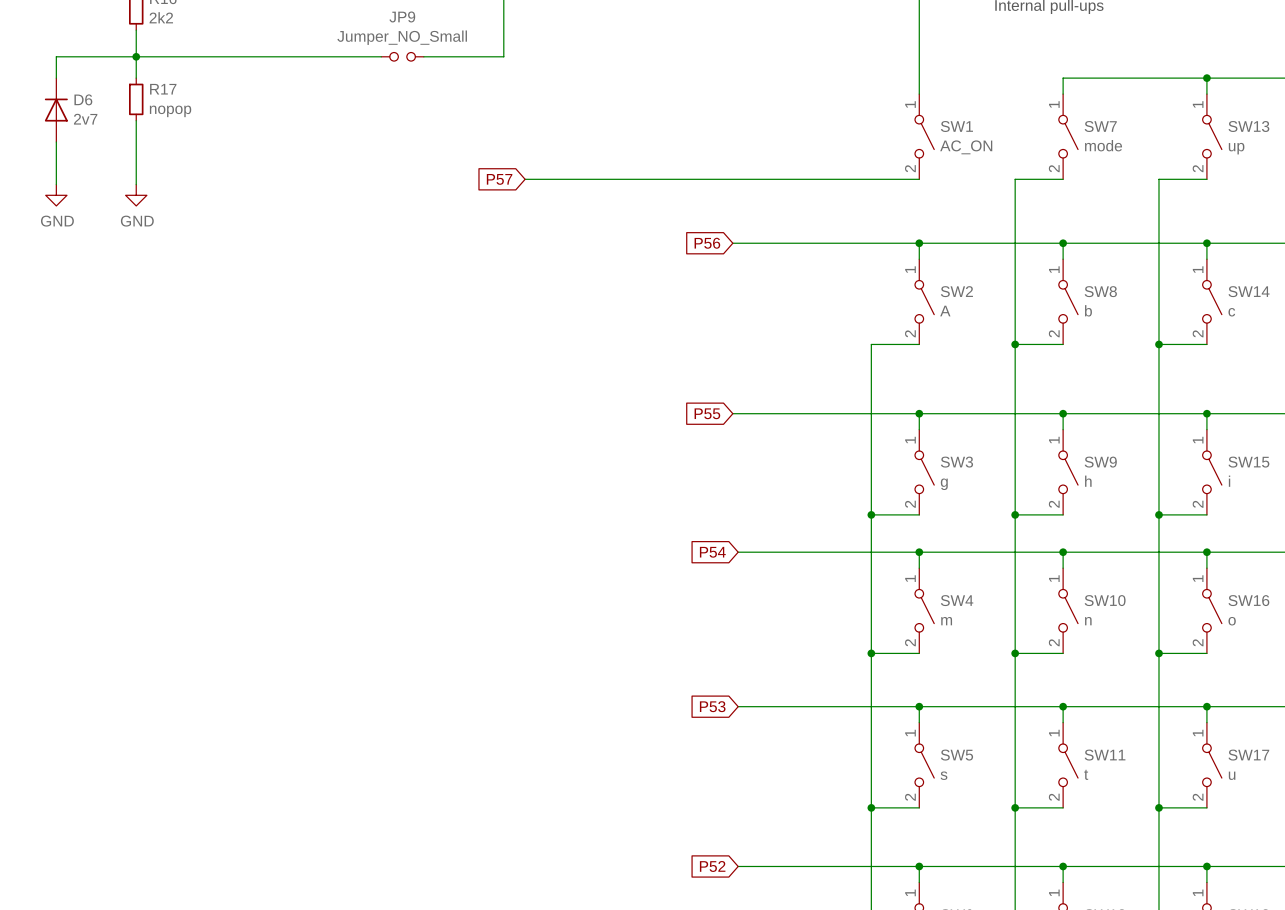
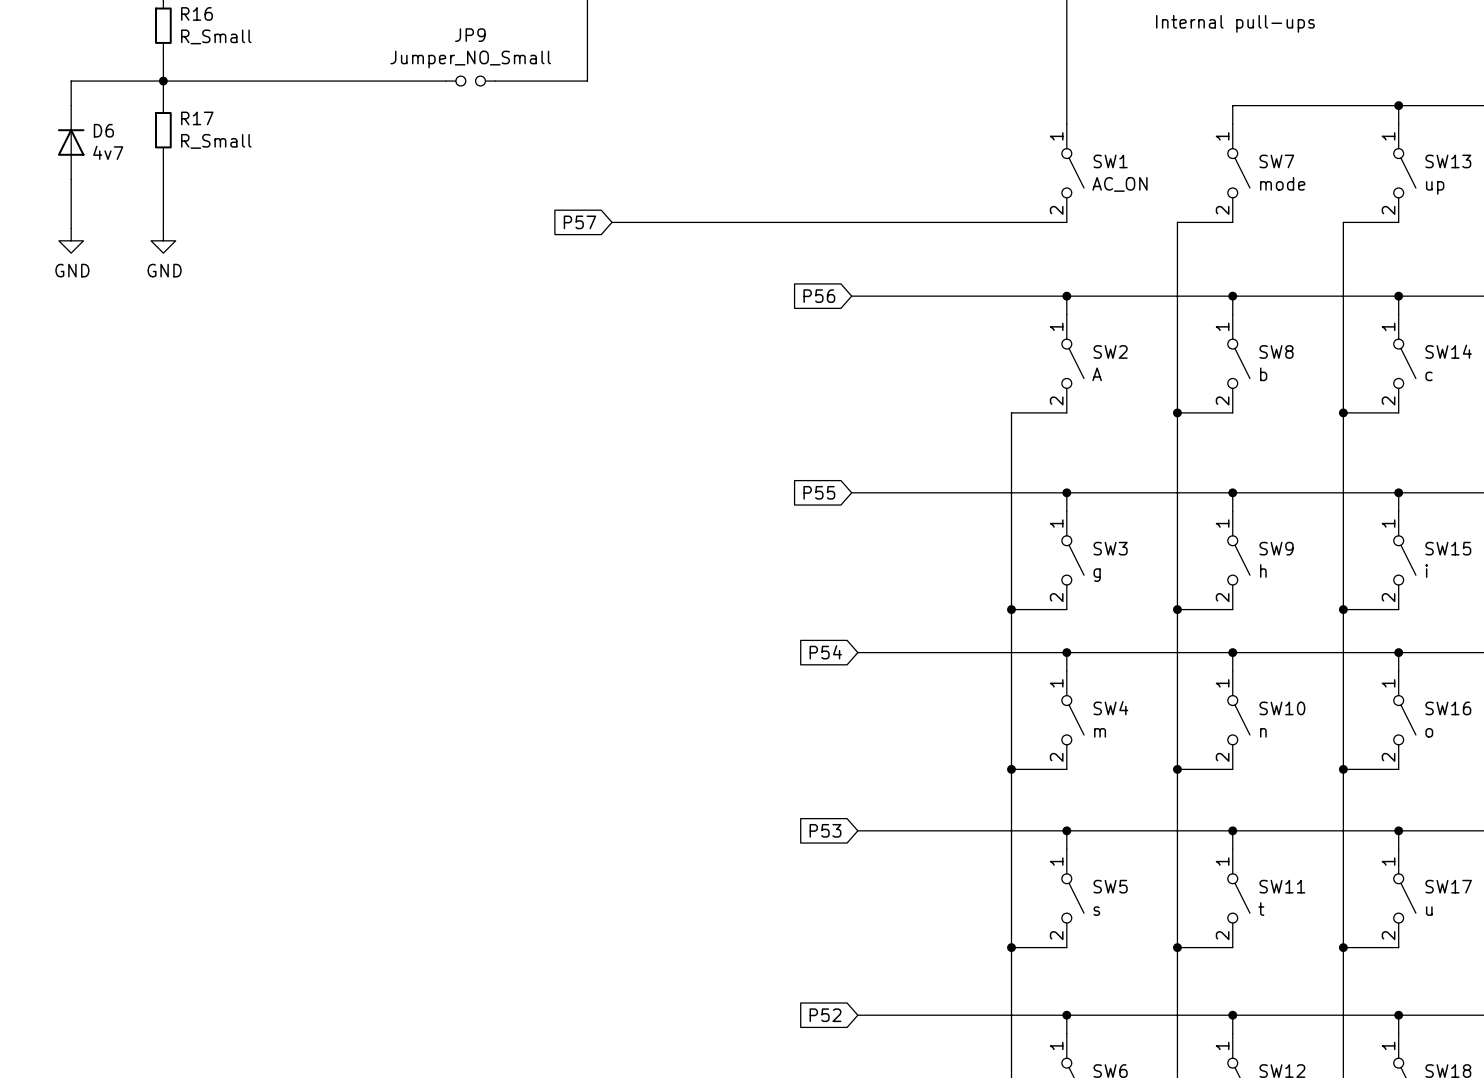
R16 value: 2k2 (161, 17) -> R_Small (216, 36)
R17 value: nopop (170, 111) -> R_Small (216, 141)
D6 value: 2v7 (85, 119) -> 4v7 (108, 152)

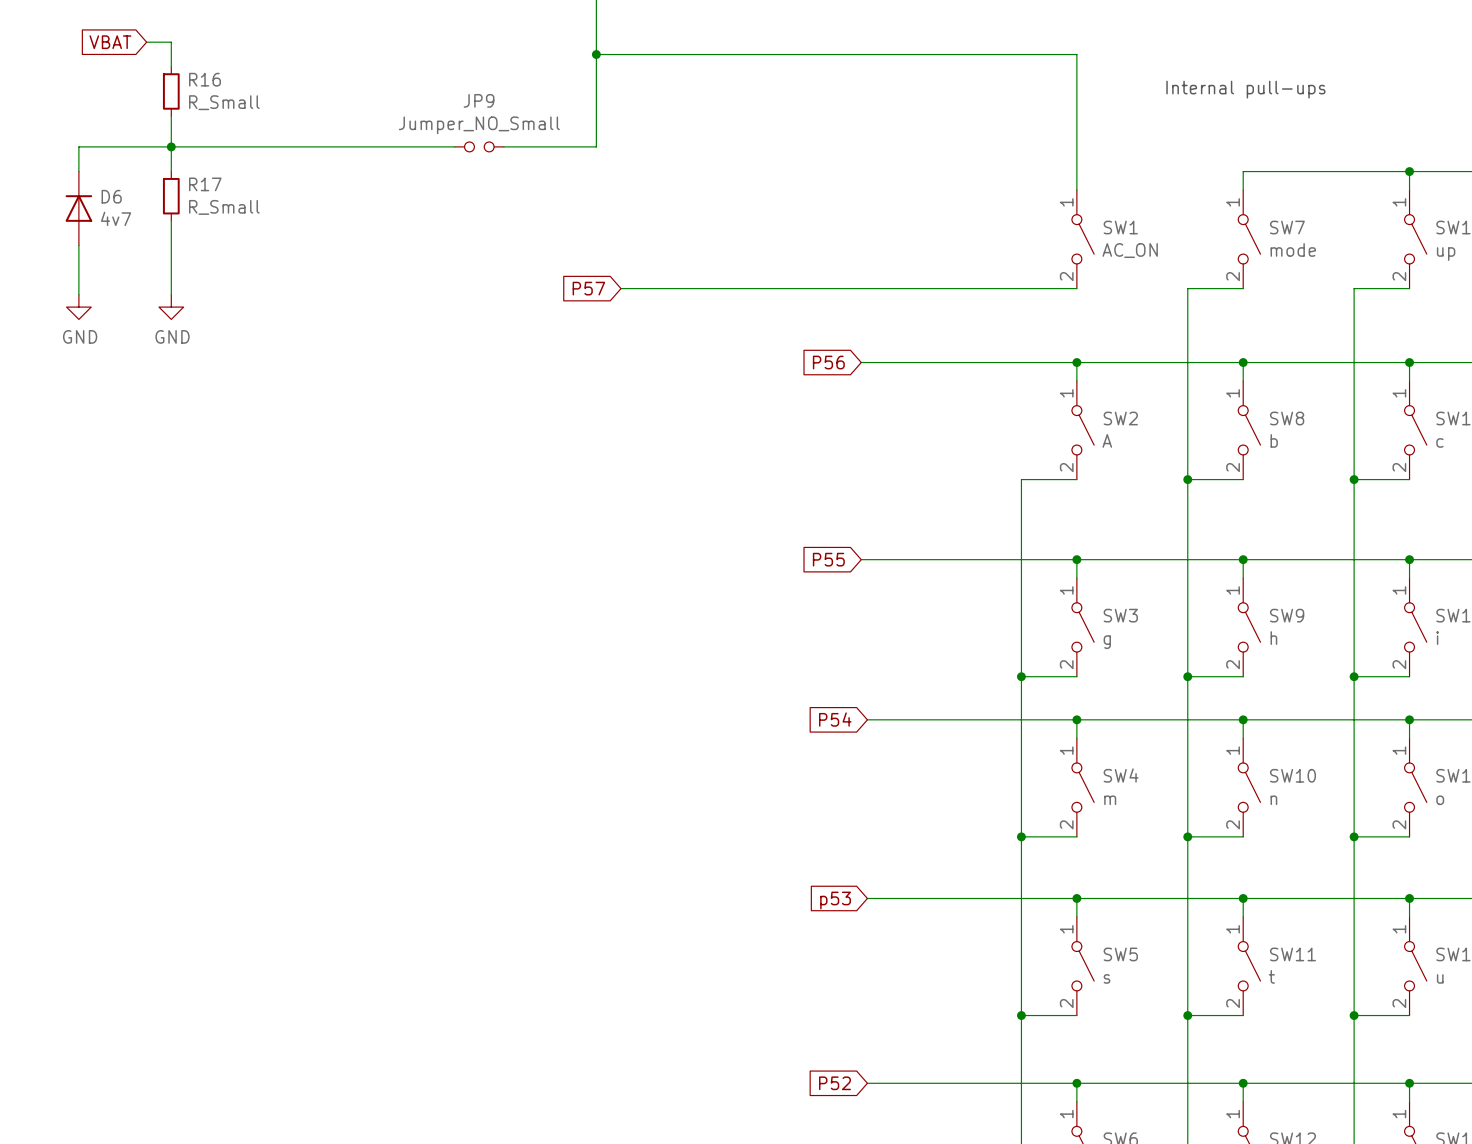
global label: P53 (825, 830) -> p53 (835, 900)

